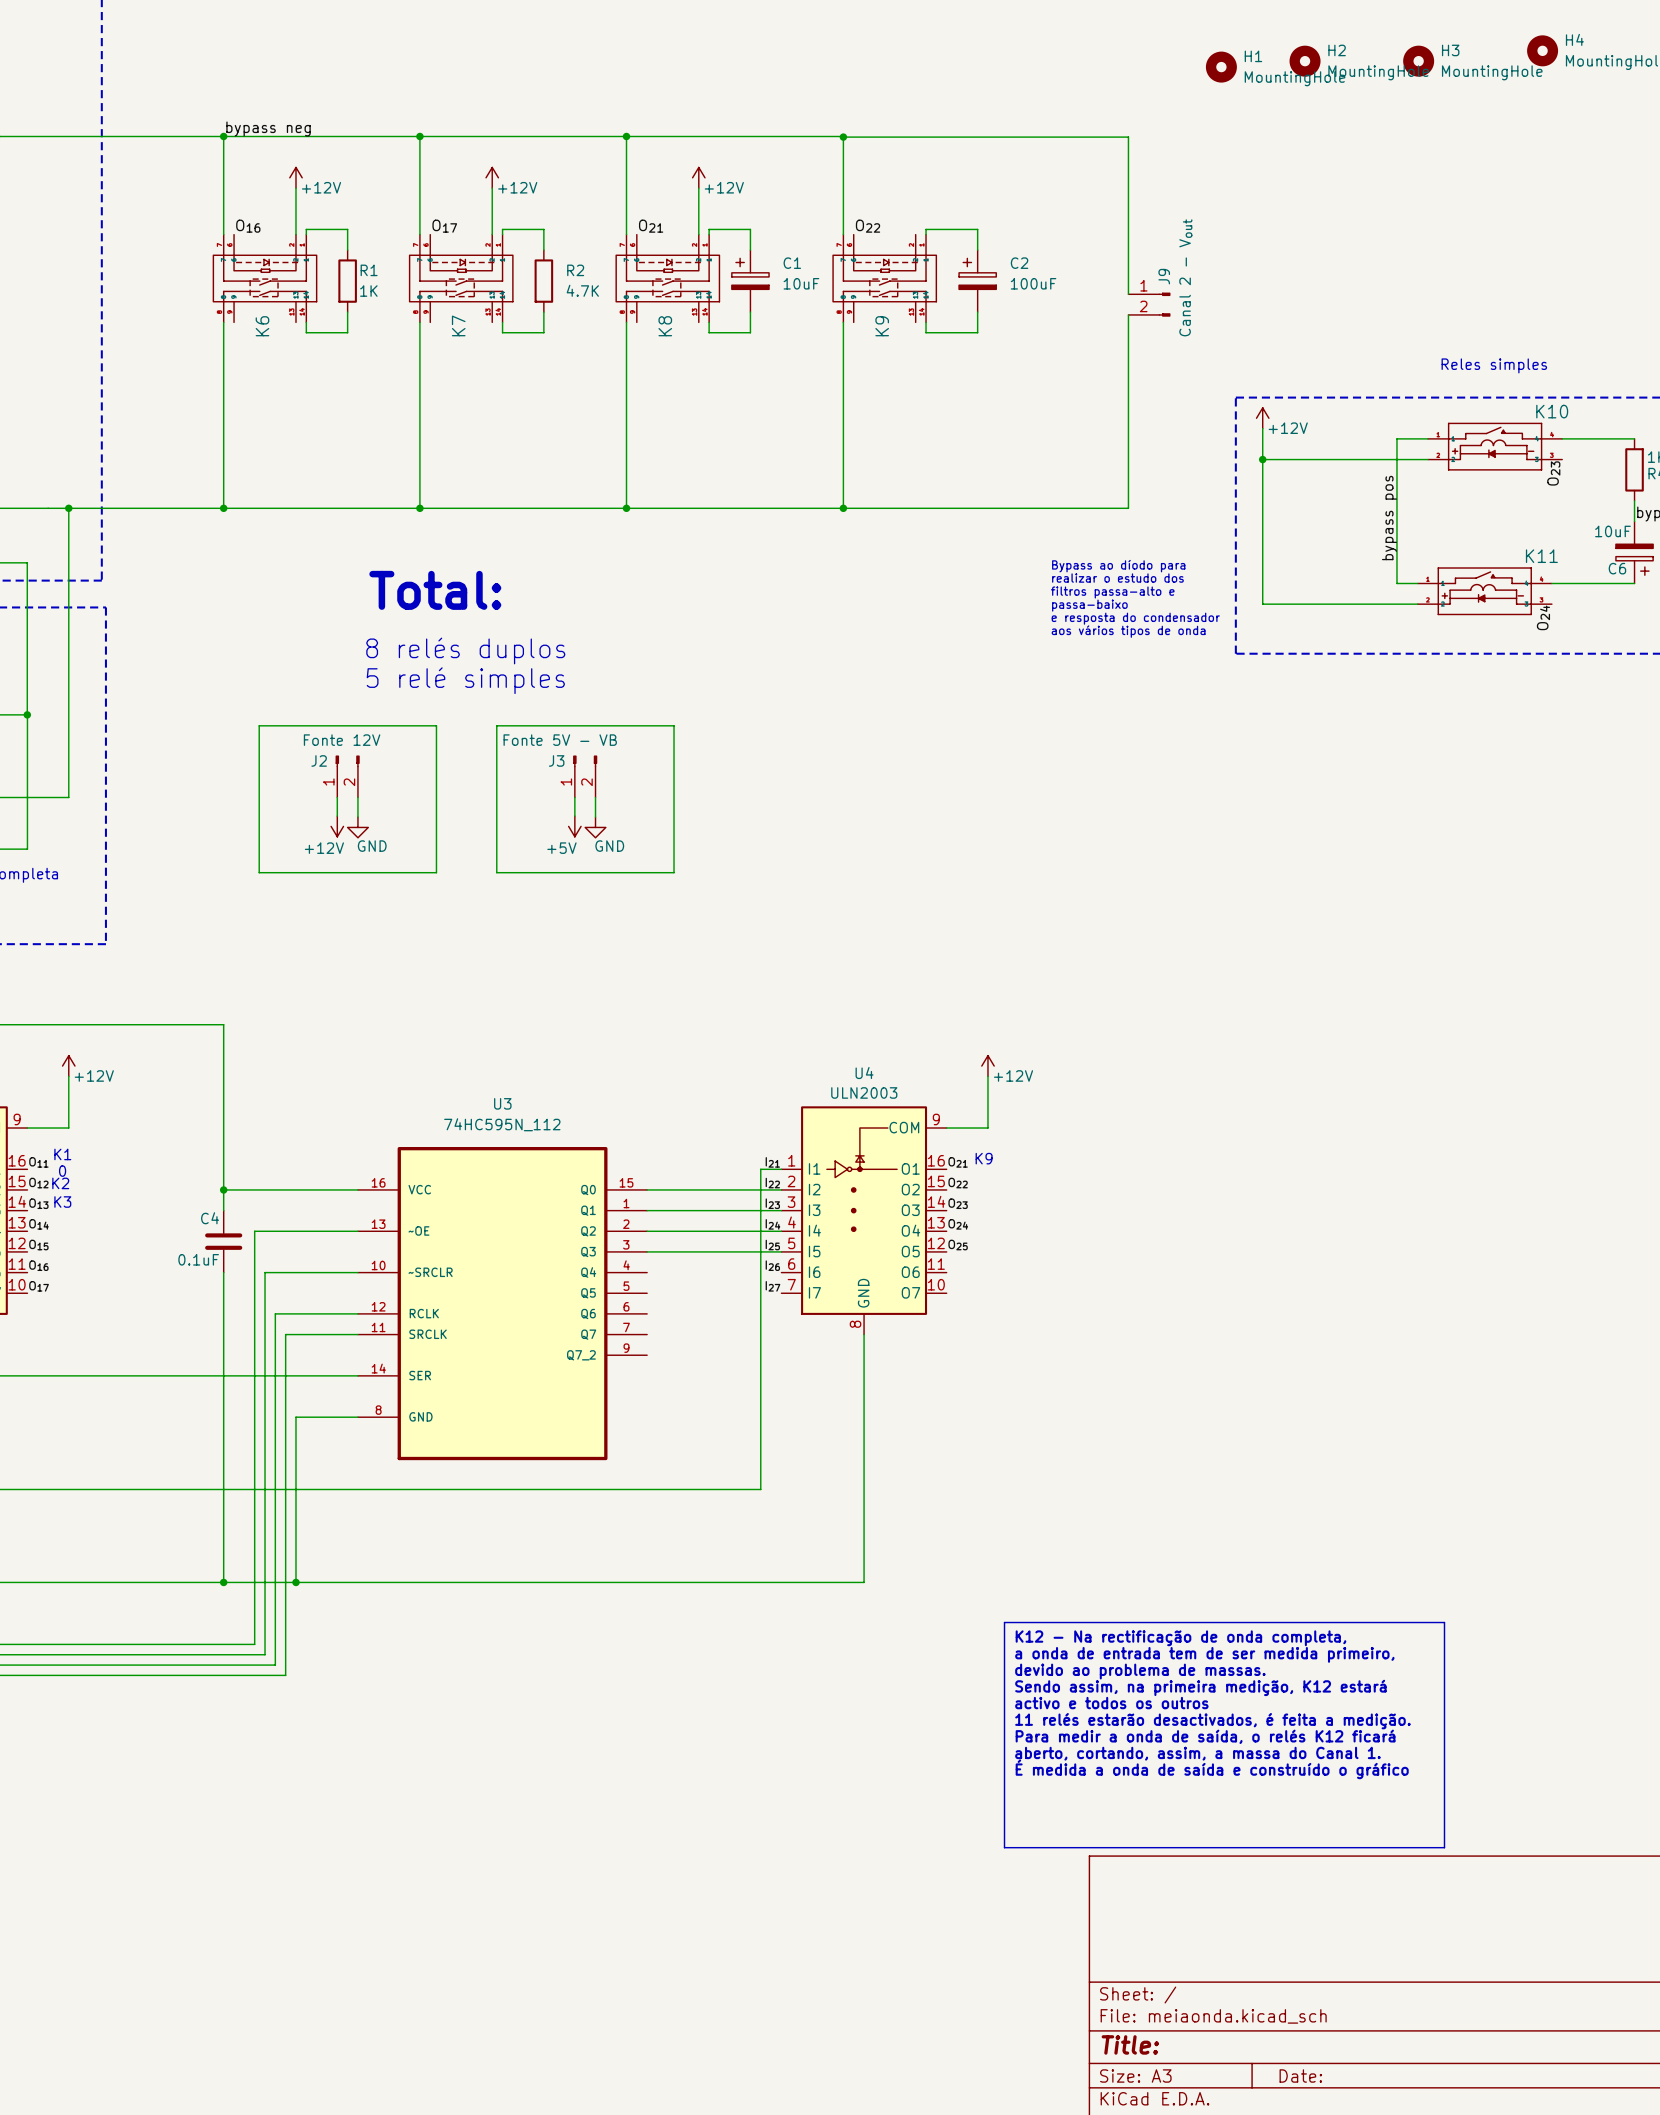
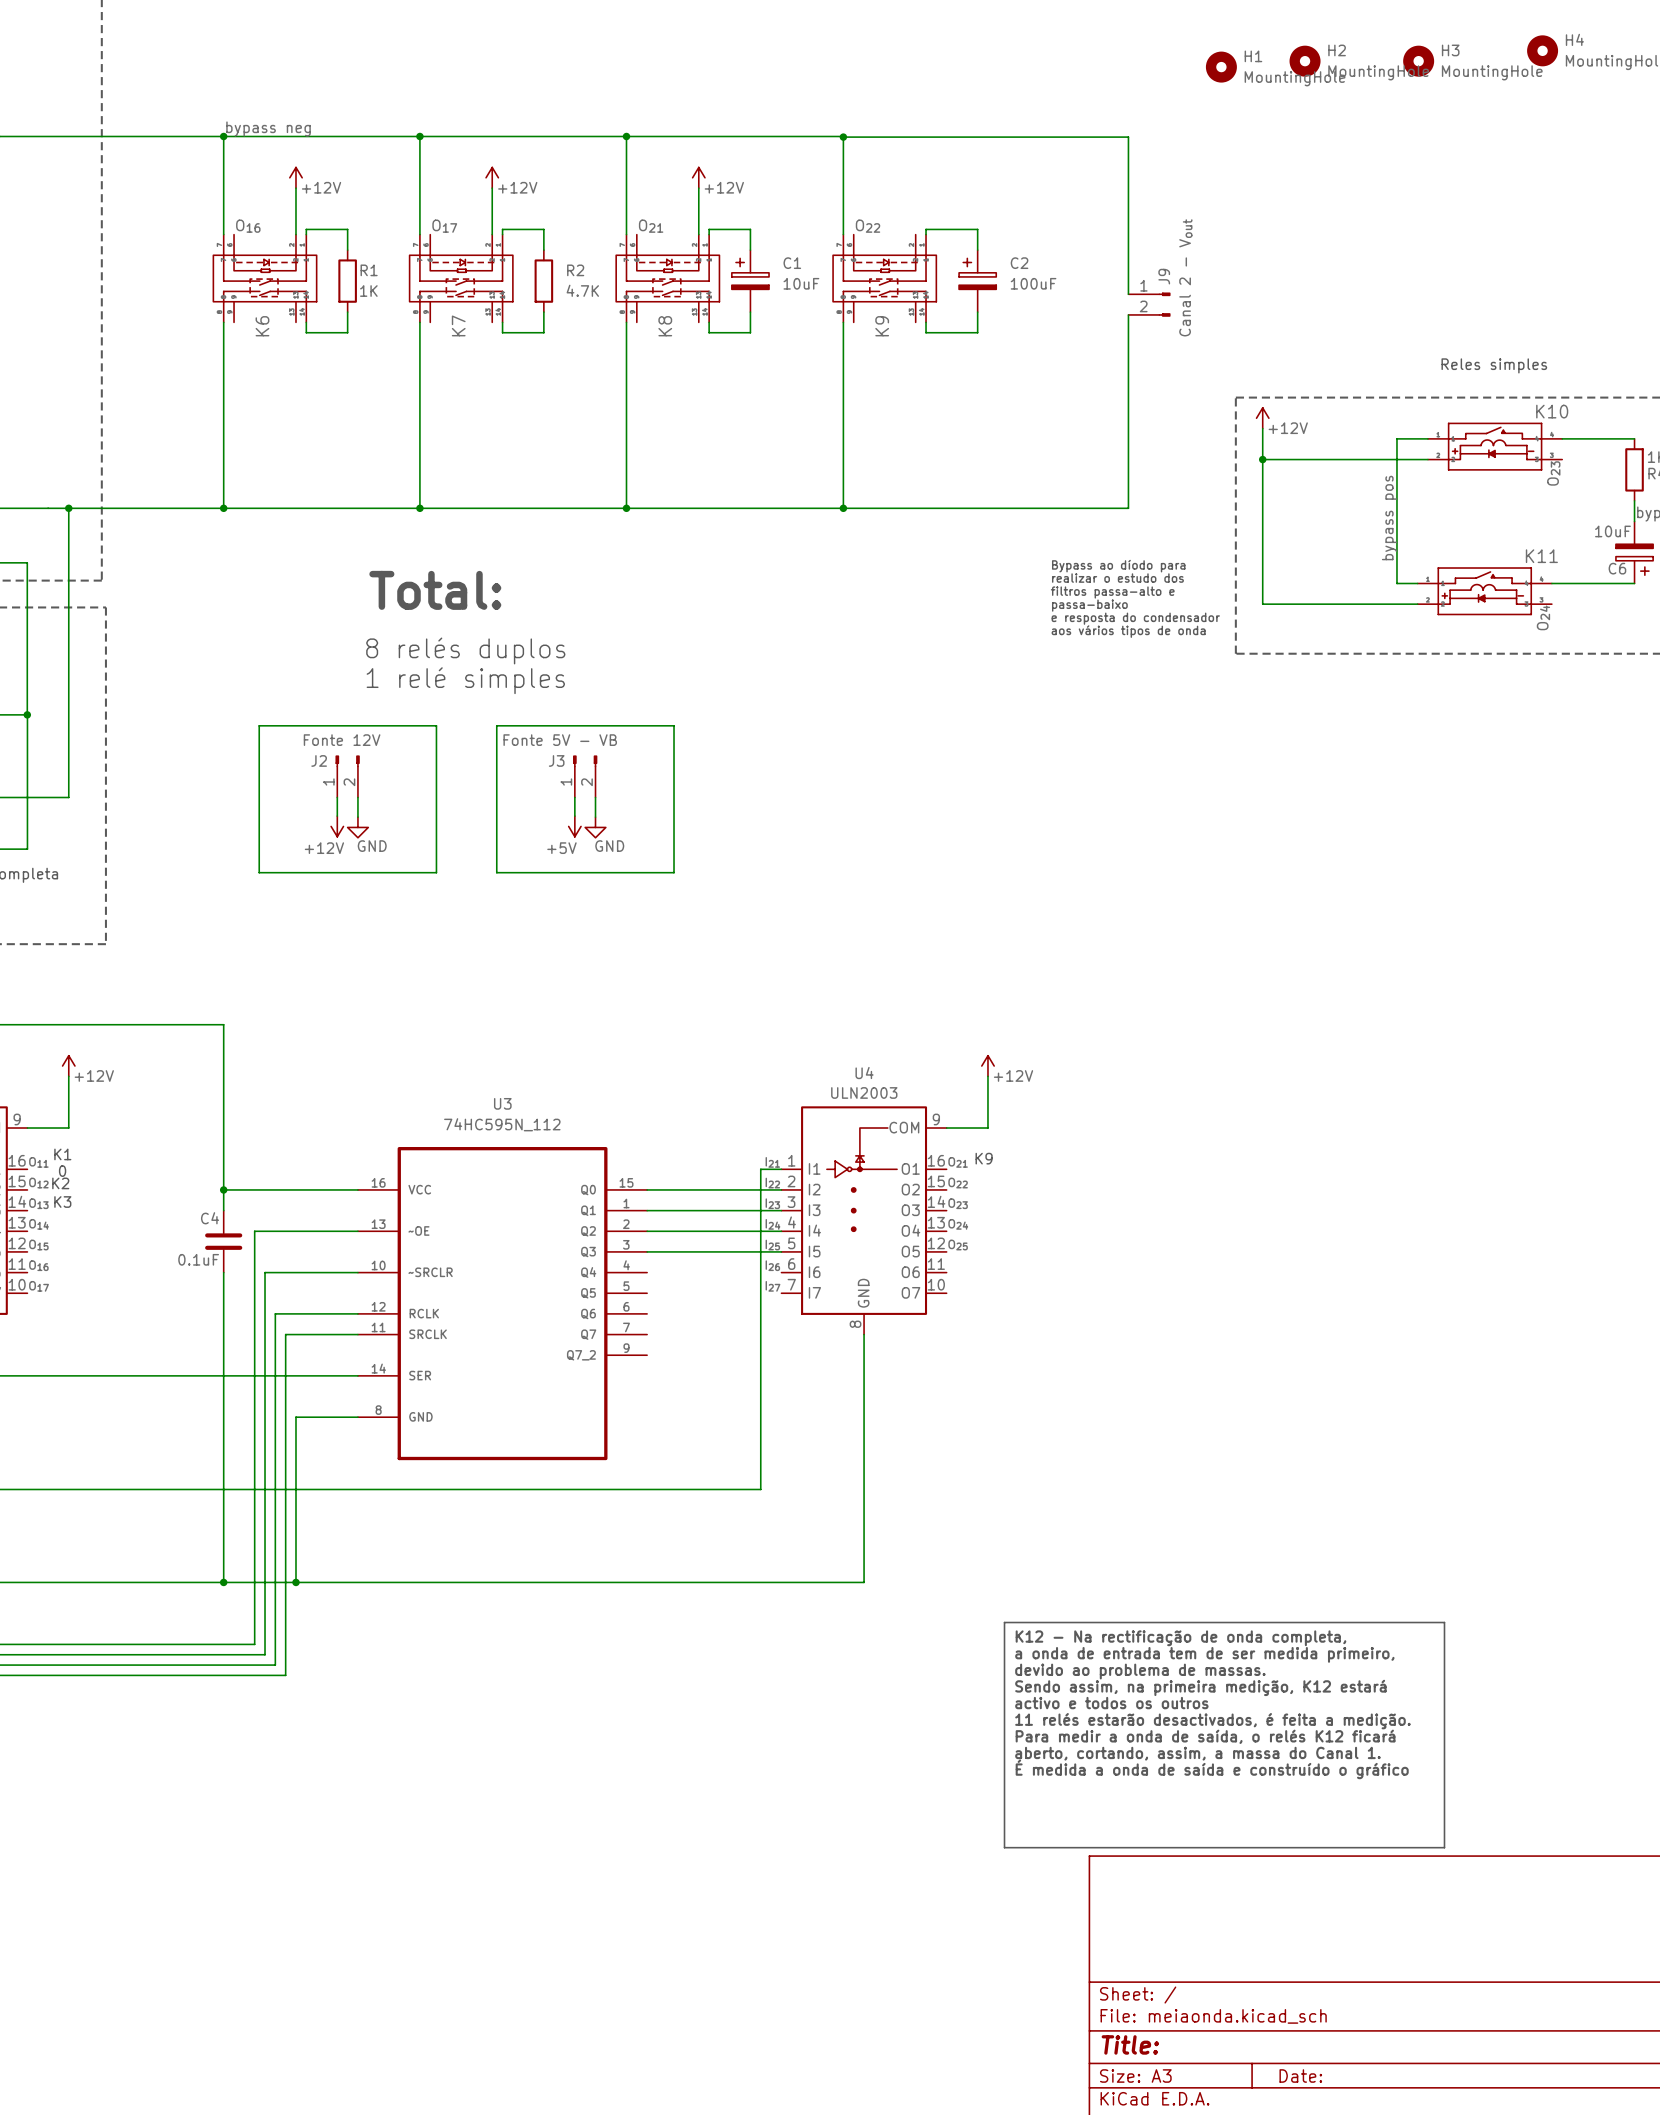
text: 5 relé simples (465, 680) -> 1 relé simples (465, 680)

